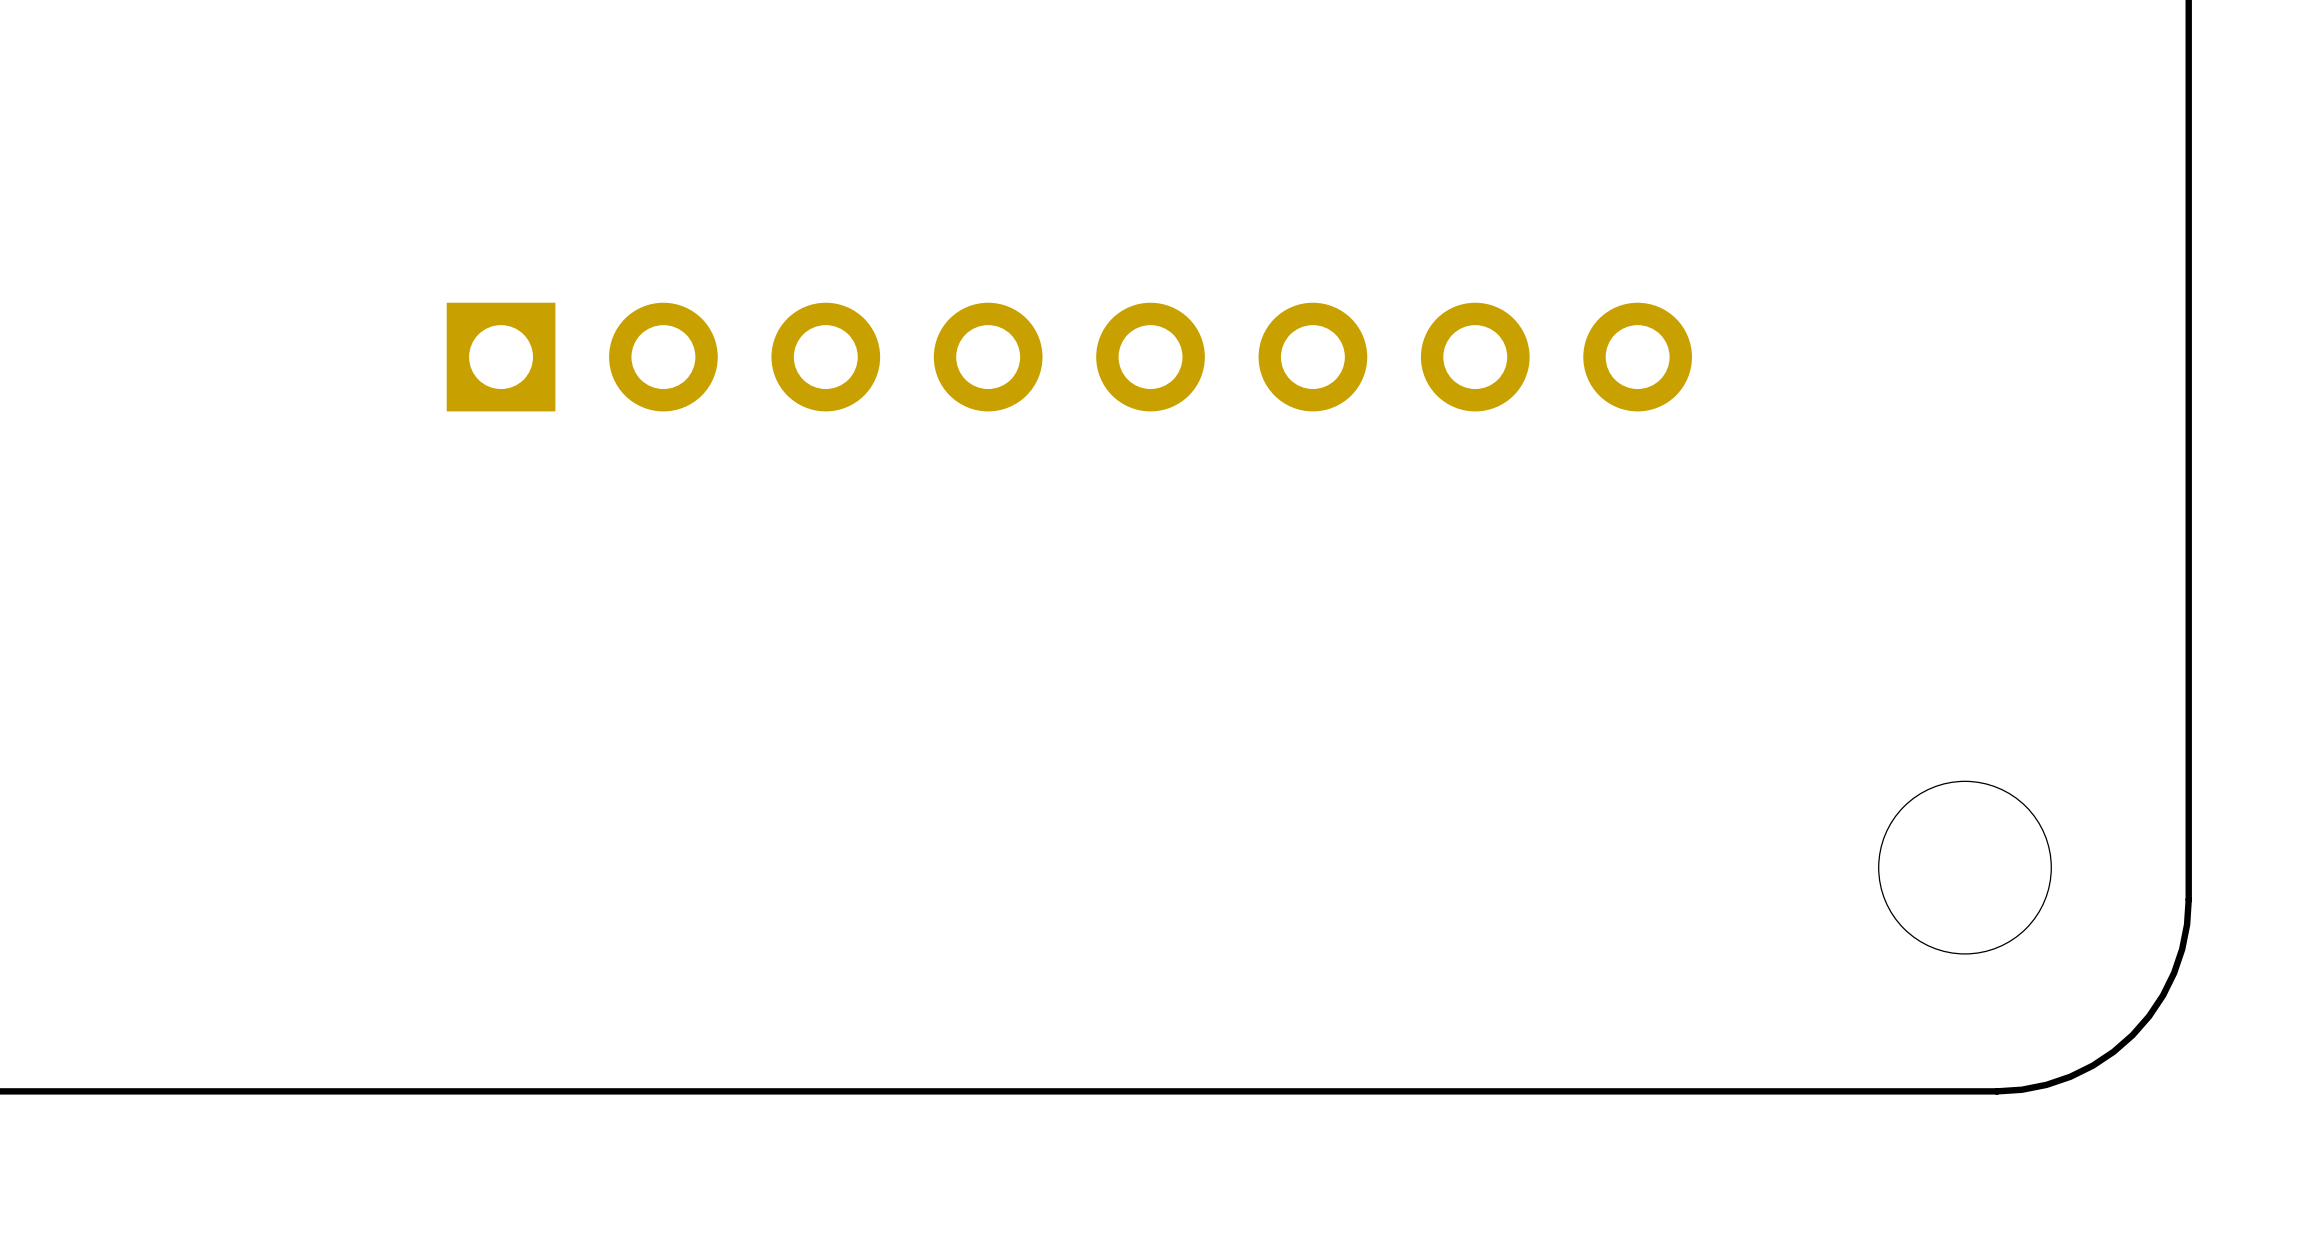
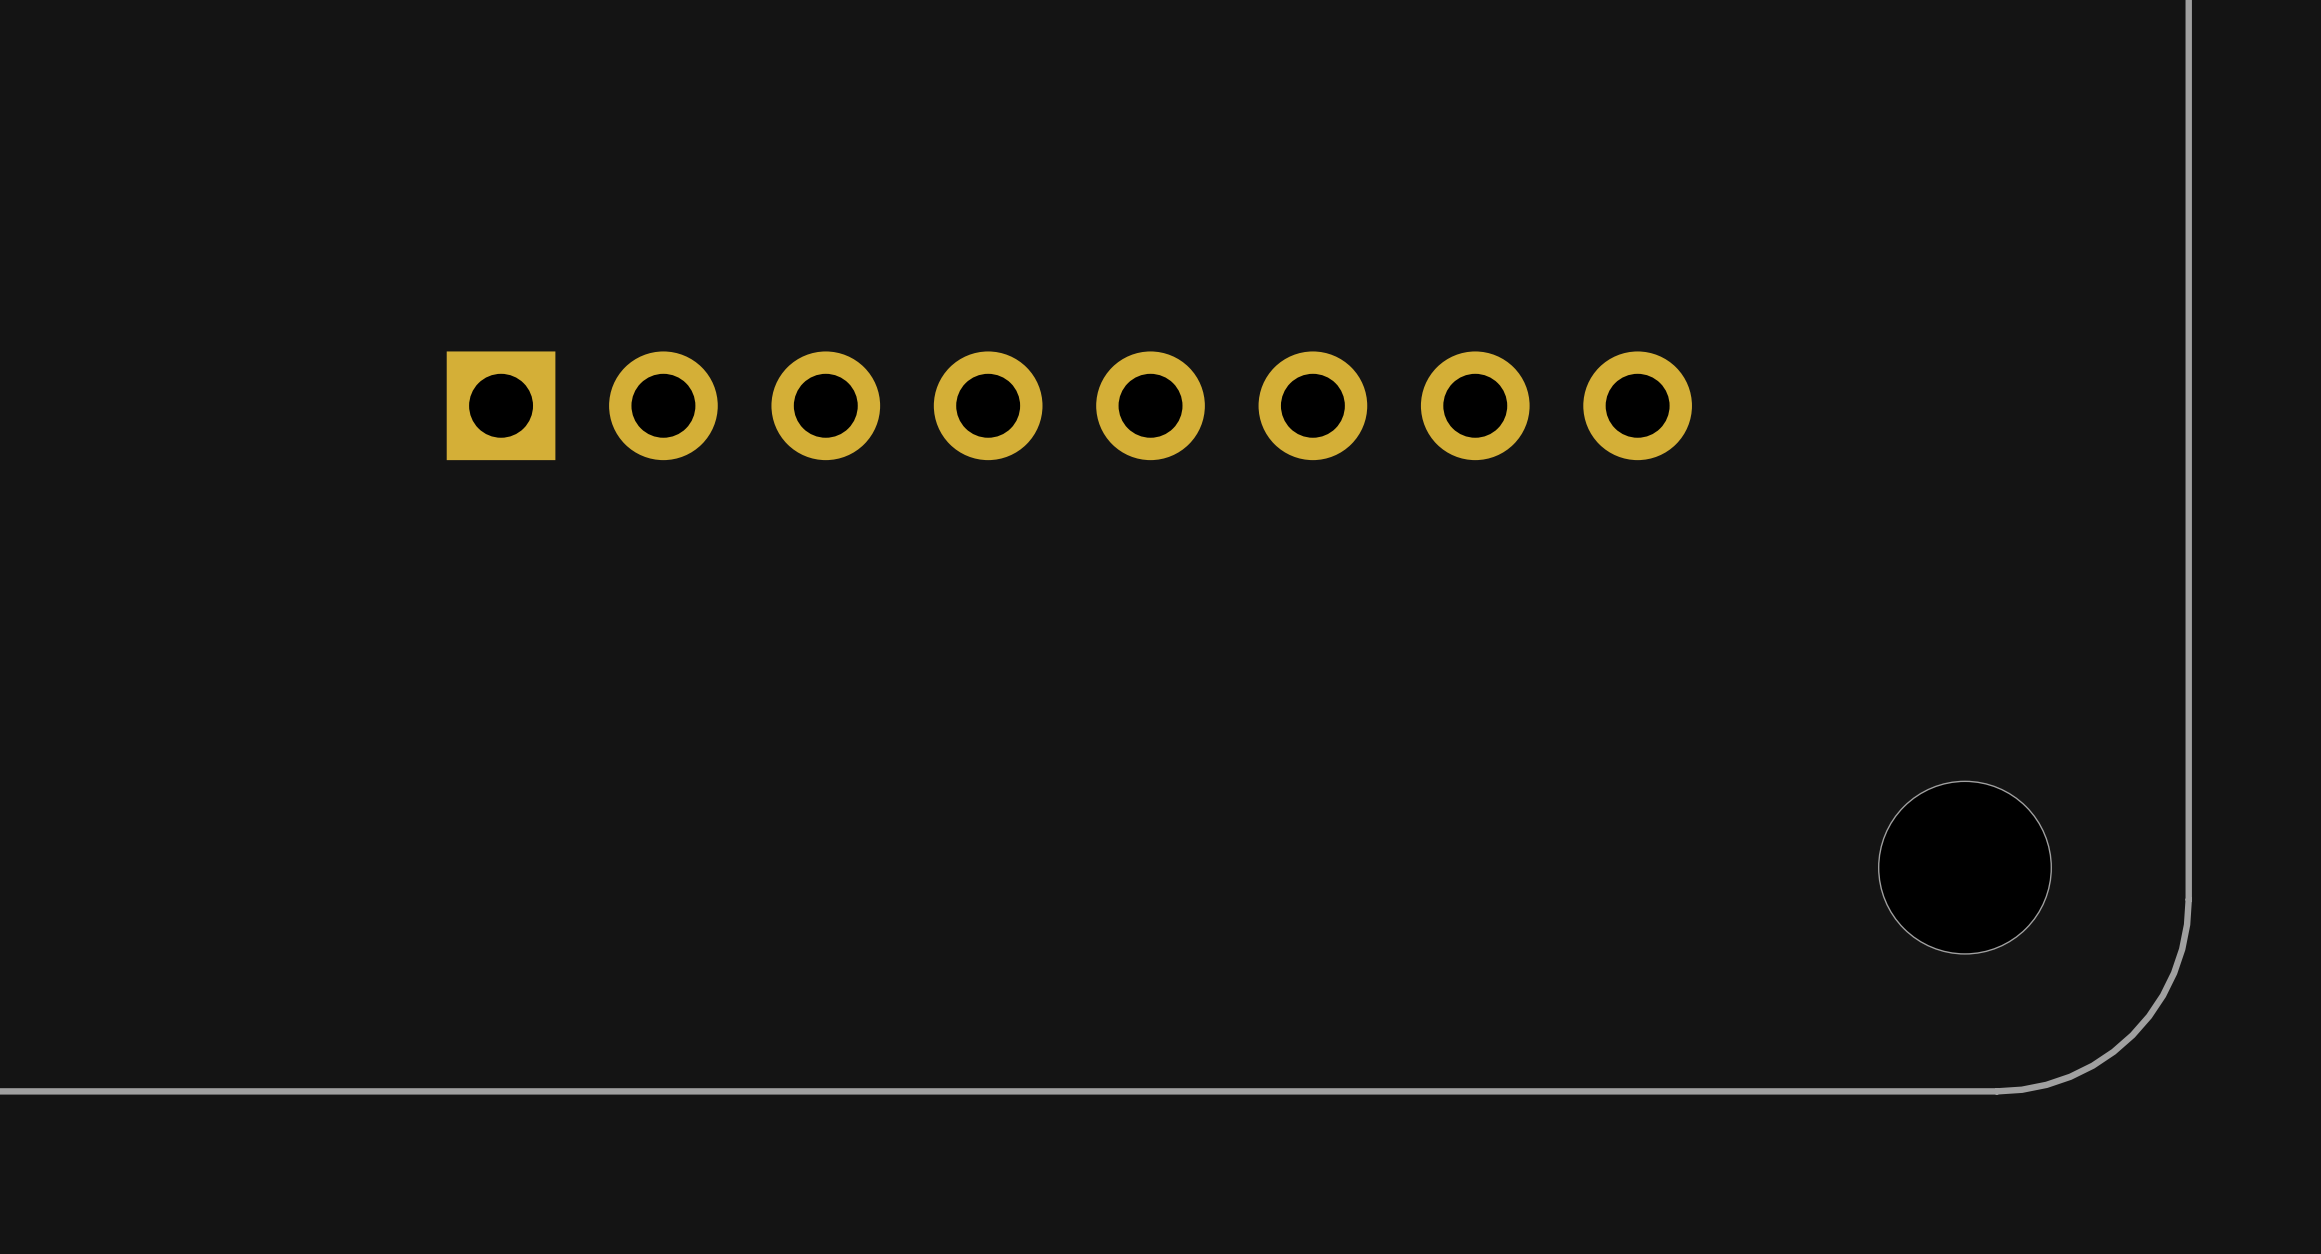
part position: (1069, 357) -> (1069, 405)

